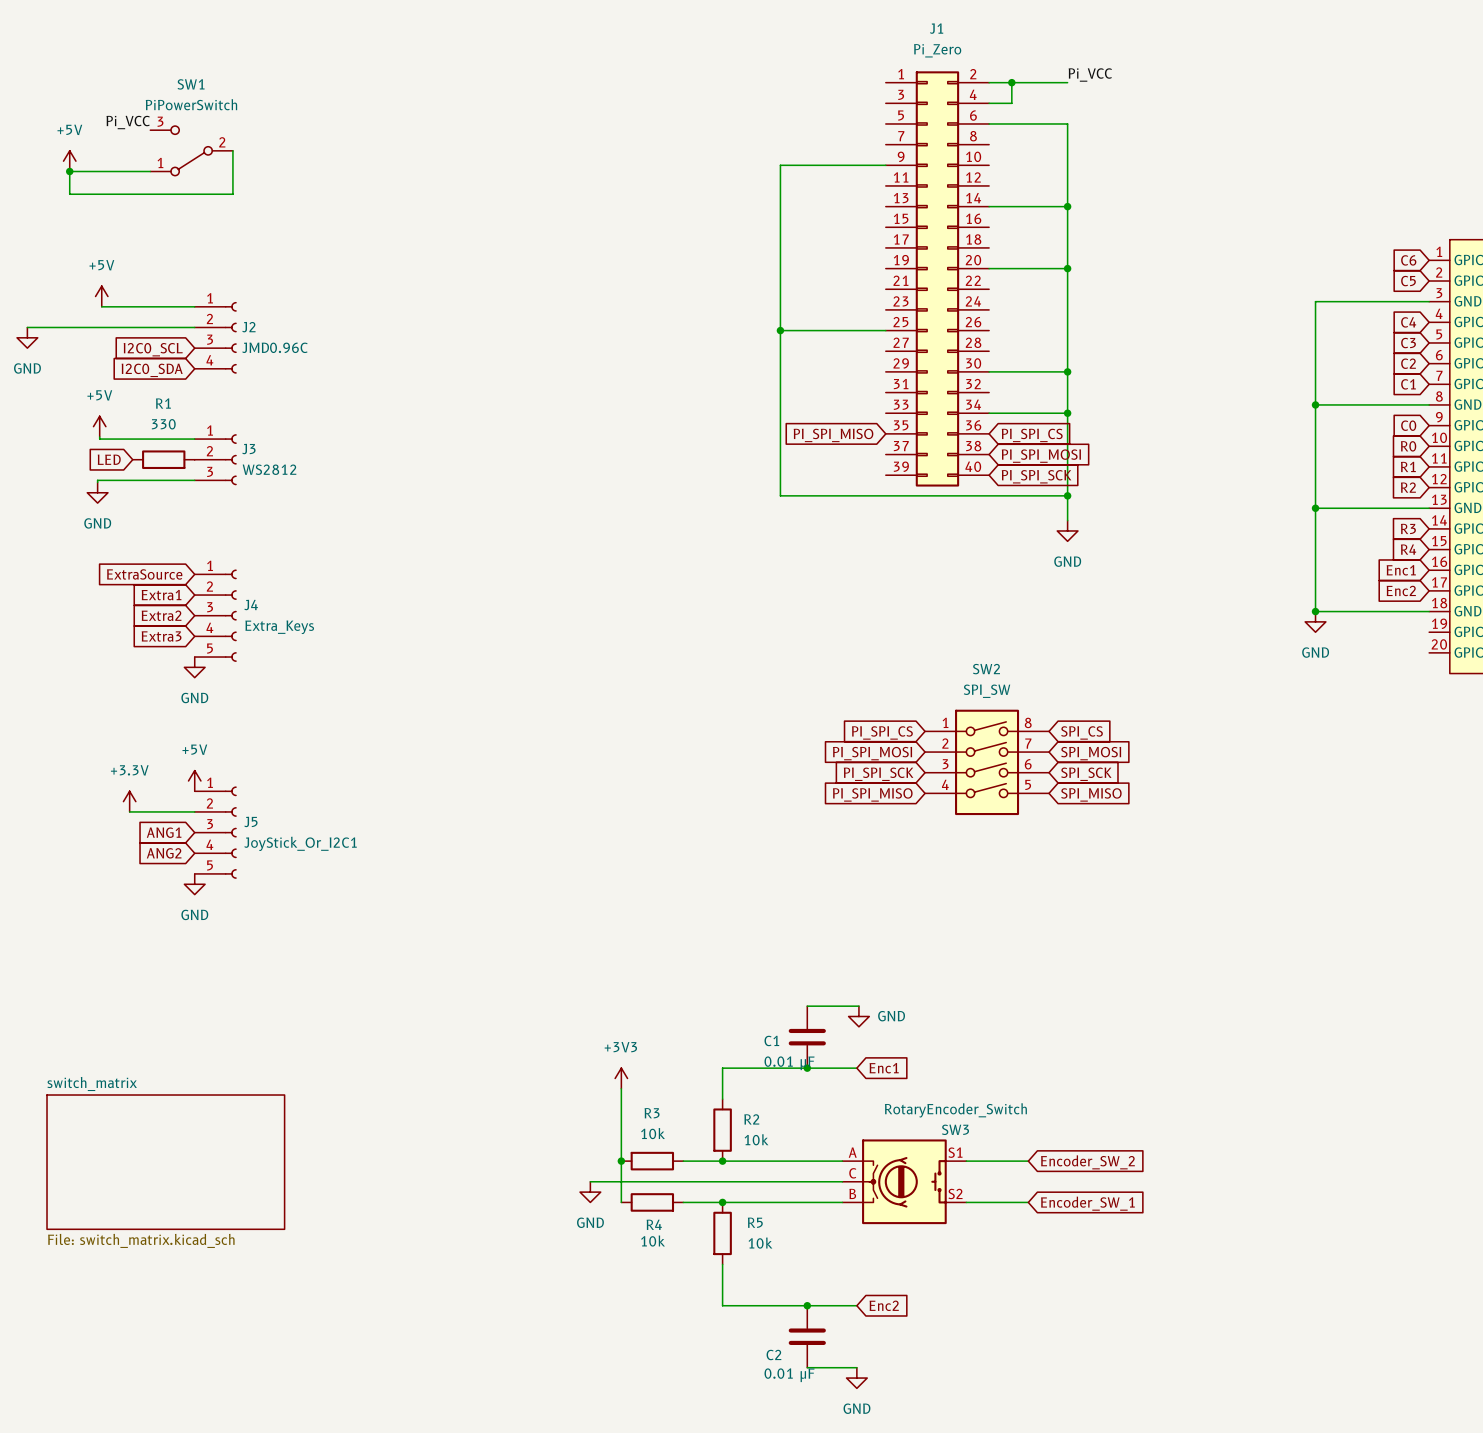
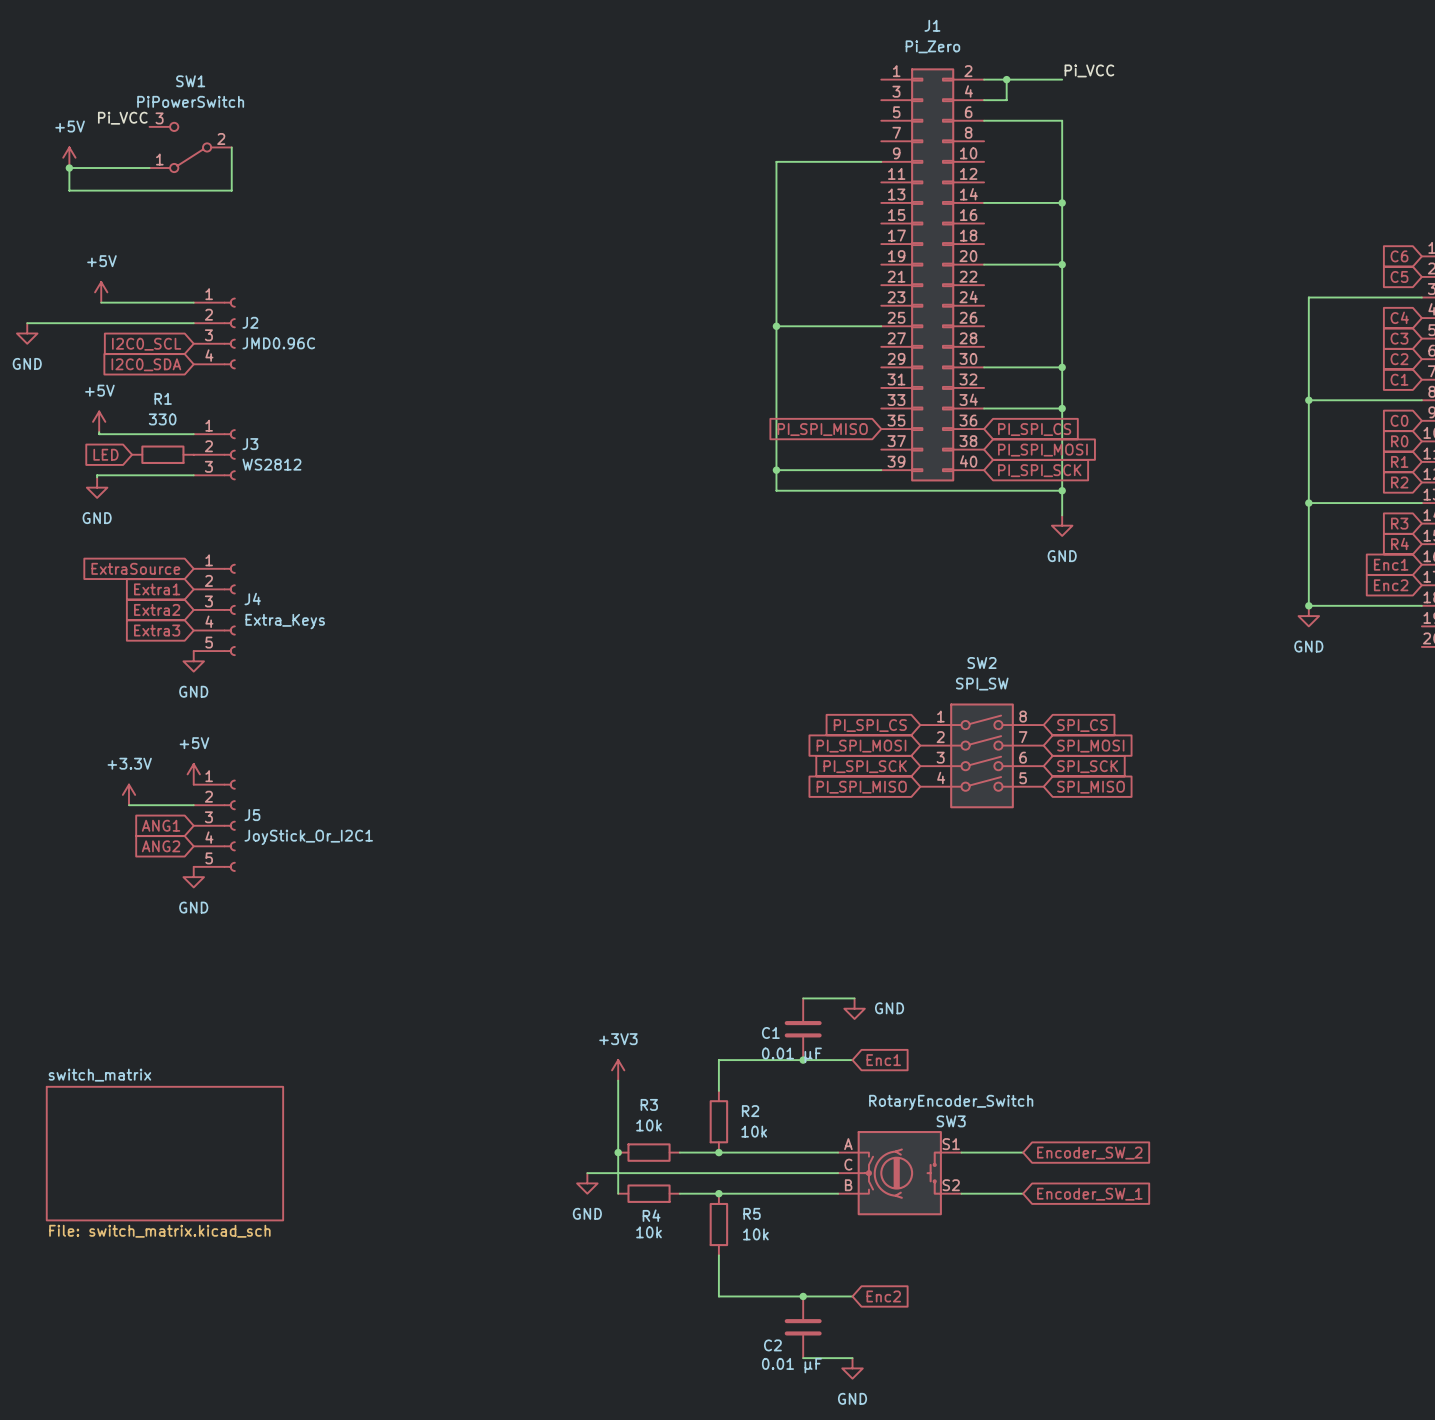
wire: none -> (776, 470) (881, 470)
junction: none -> (776, 470)

